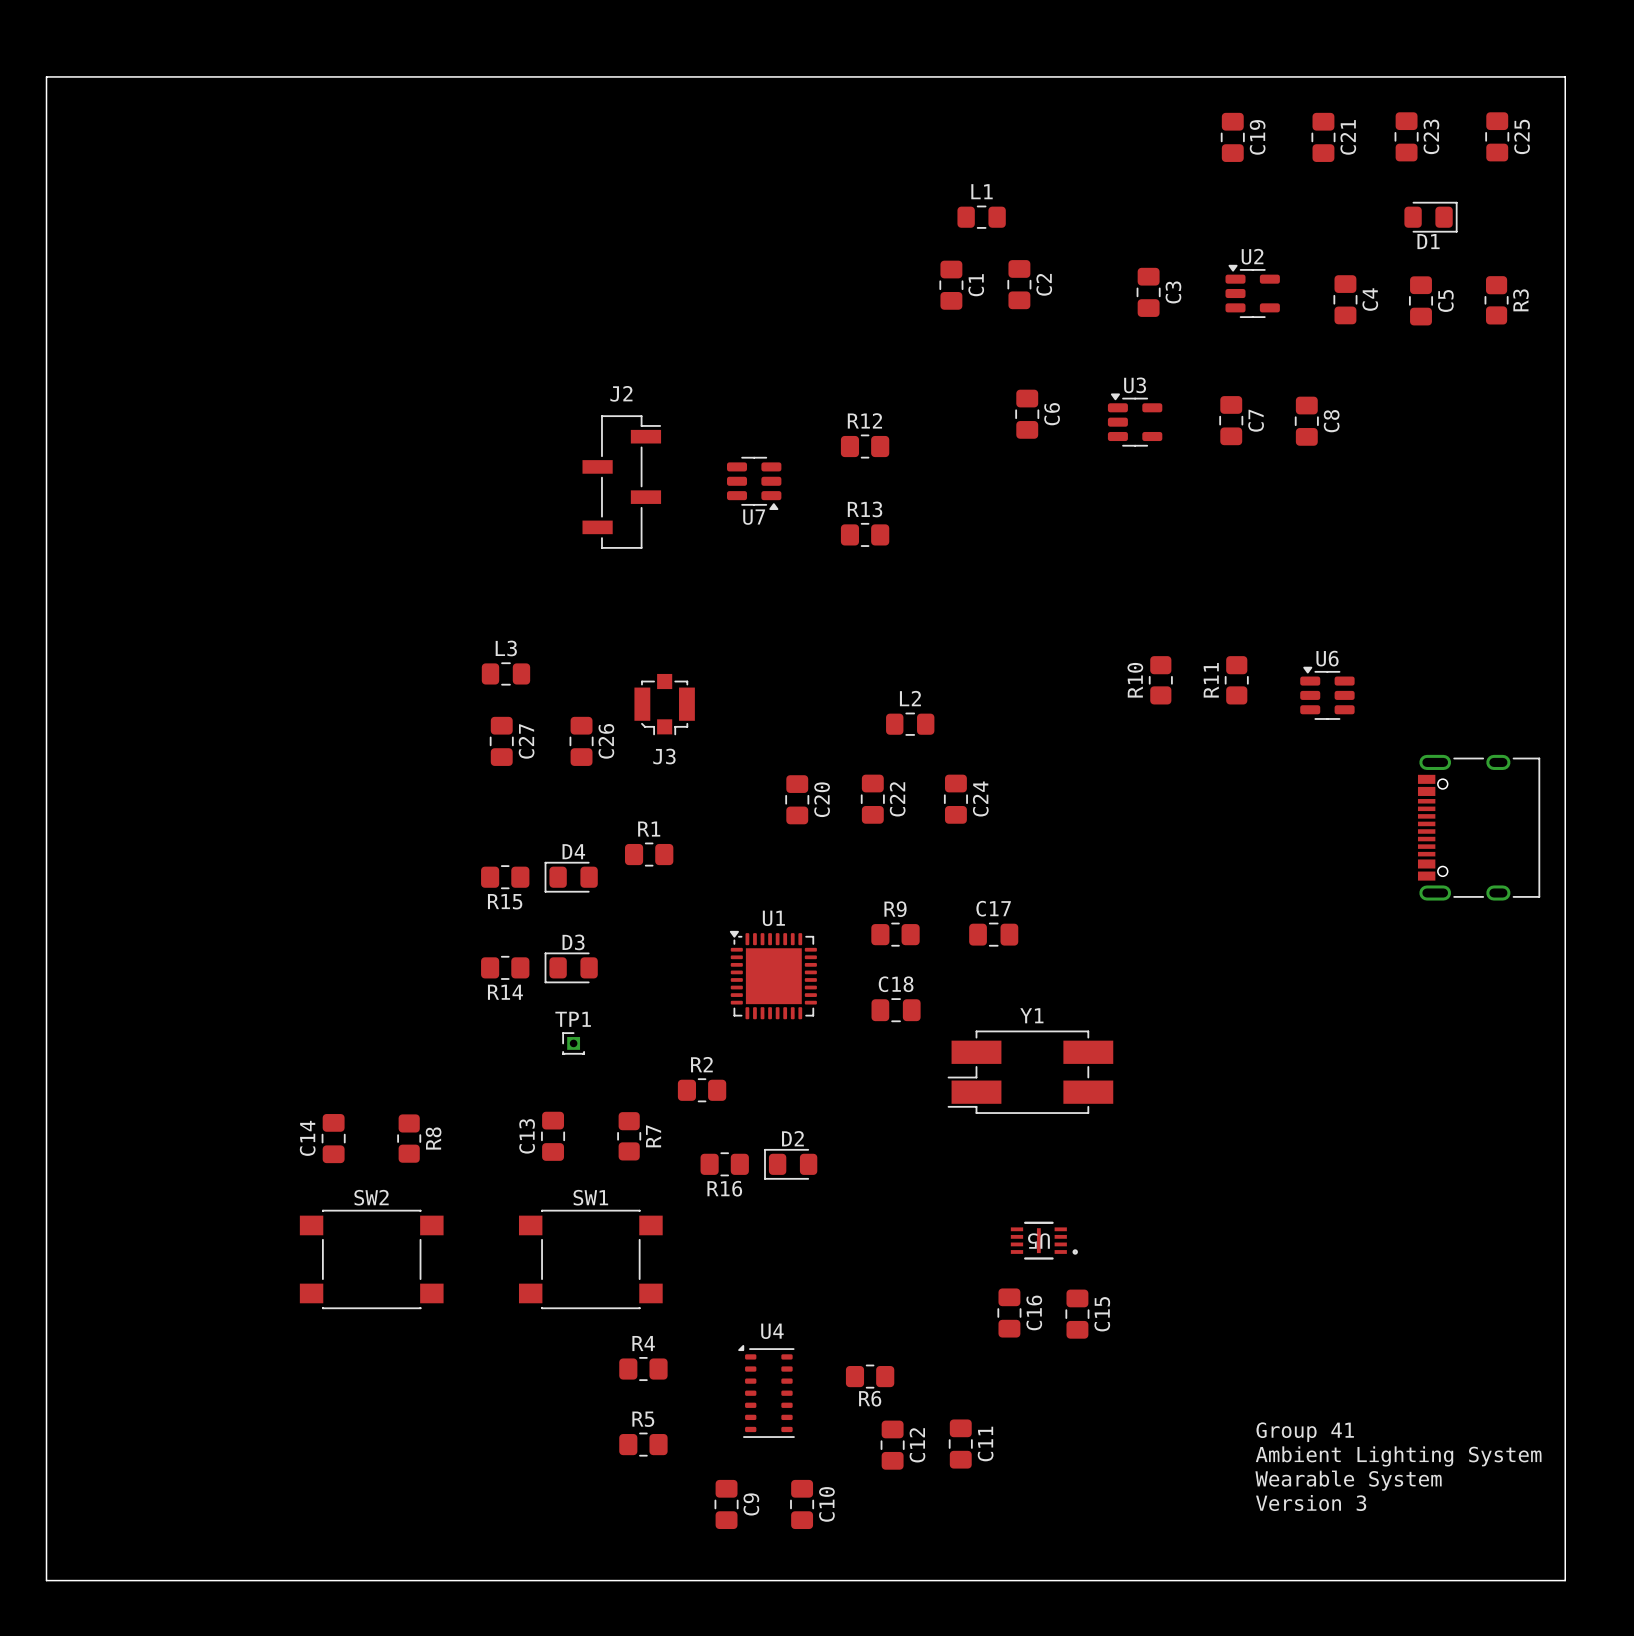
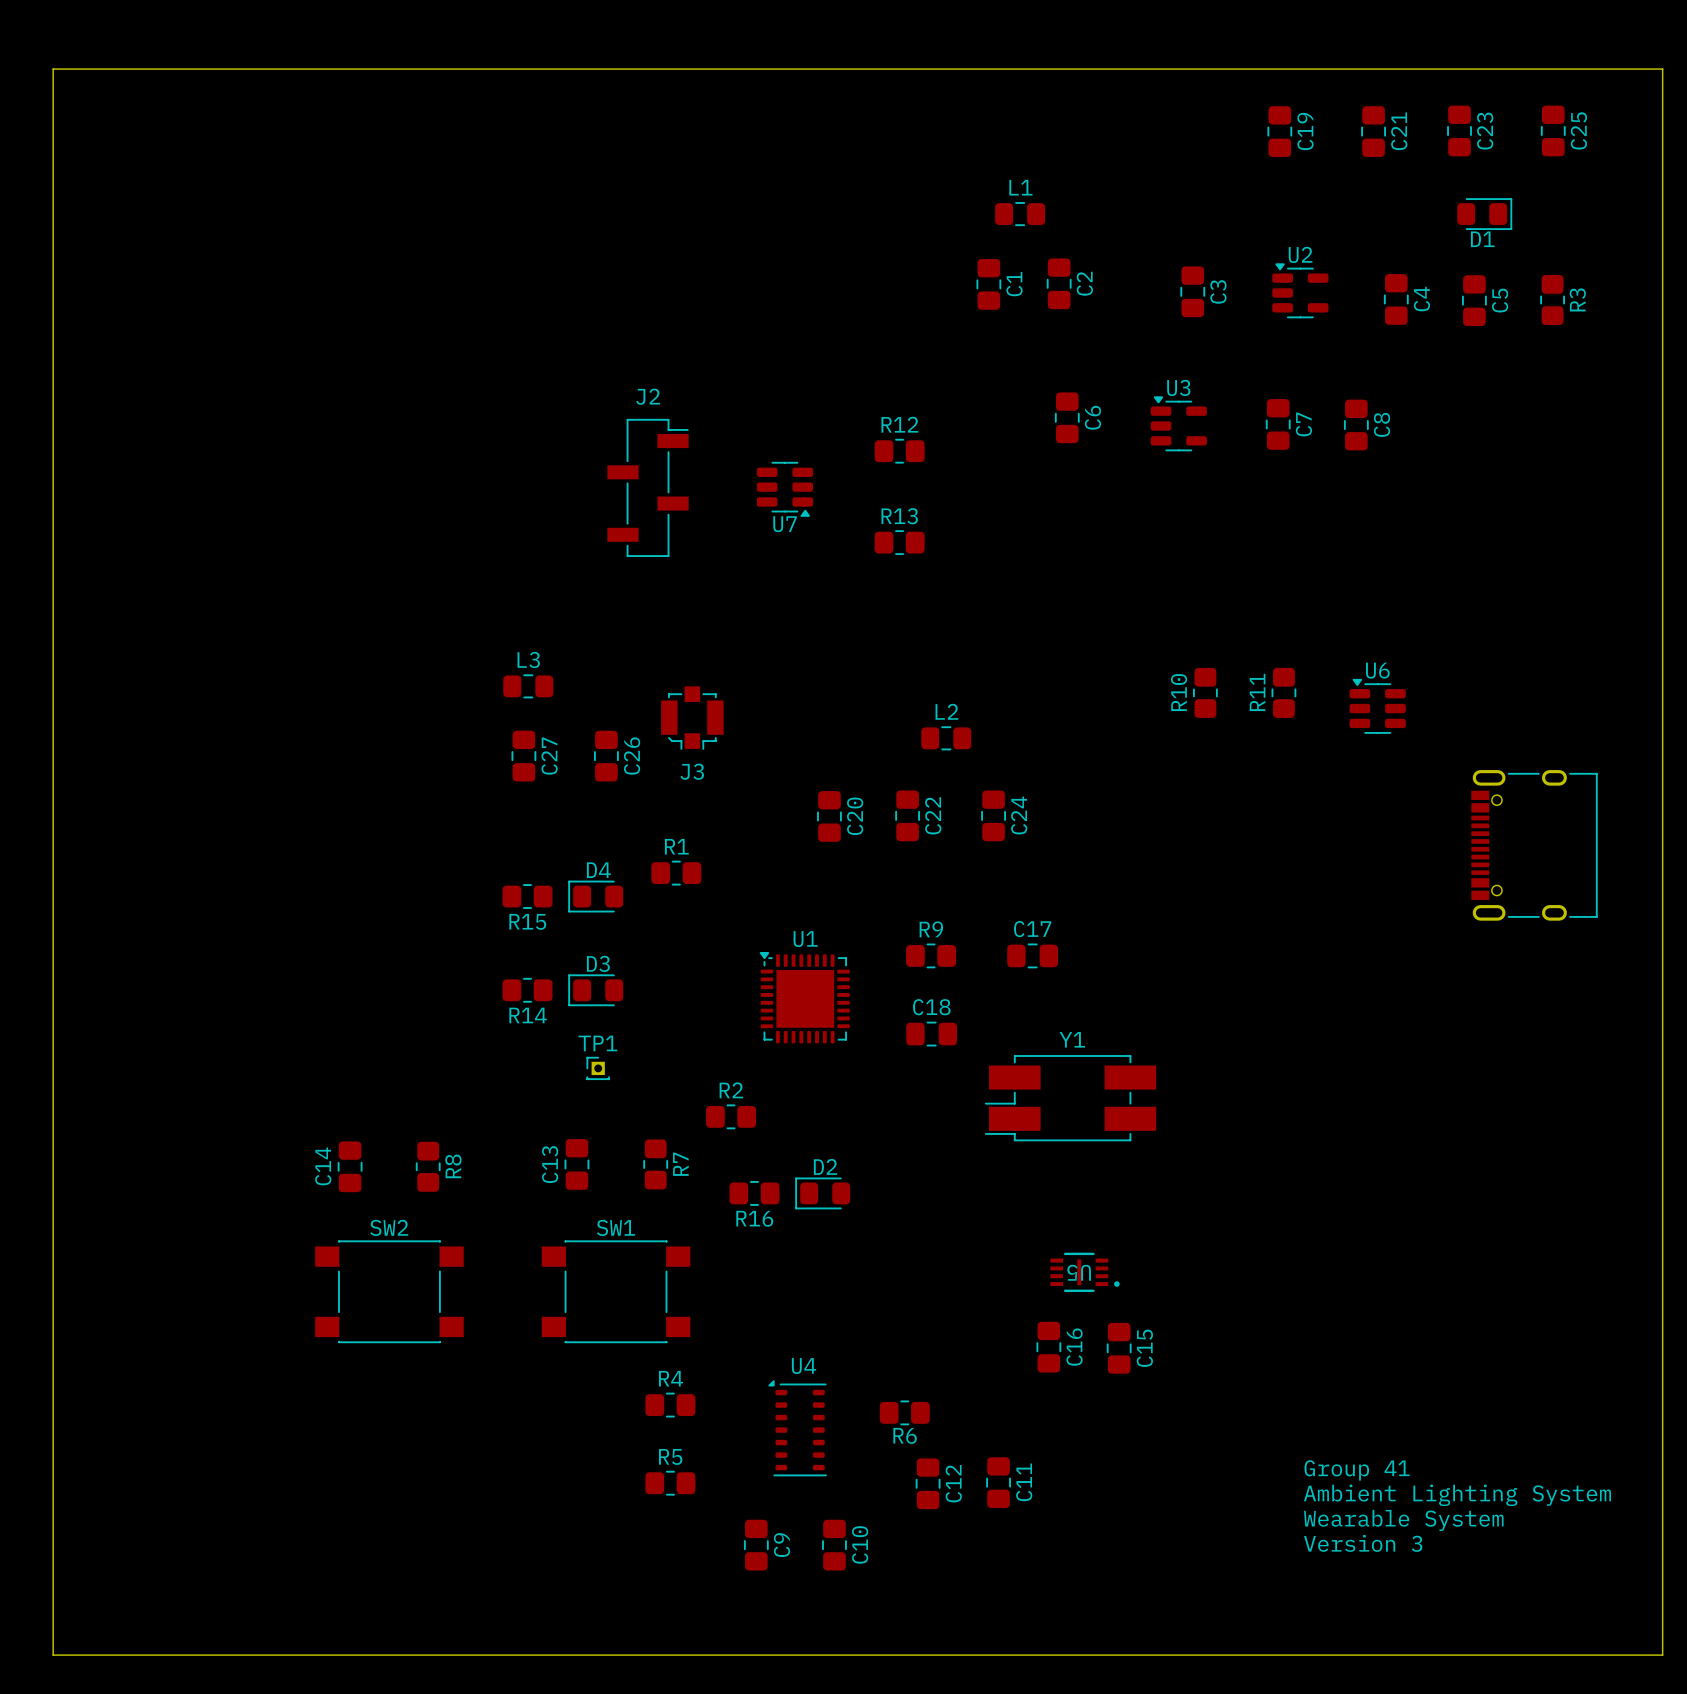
board edge: (1565, 76) (1565, 1580) (46, 1580) -> (1623, 69) (1662, 69) (1662, 1655) (53, 1655) (53, 1623)

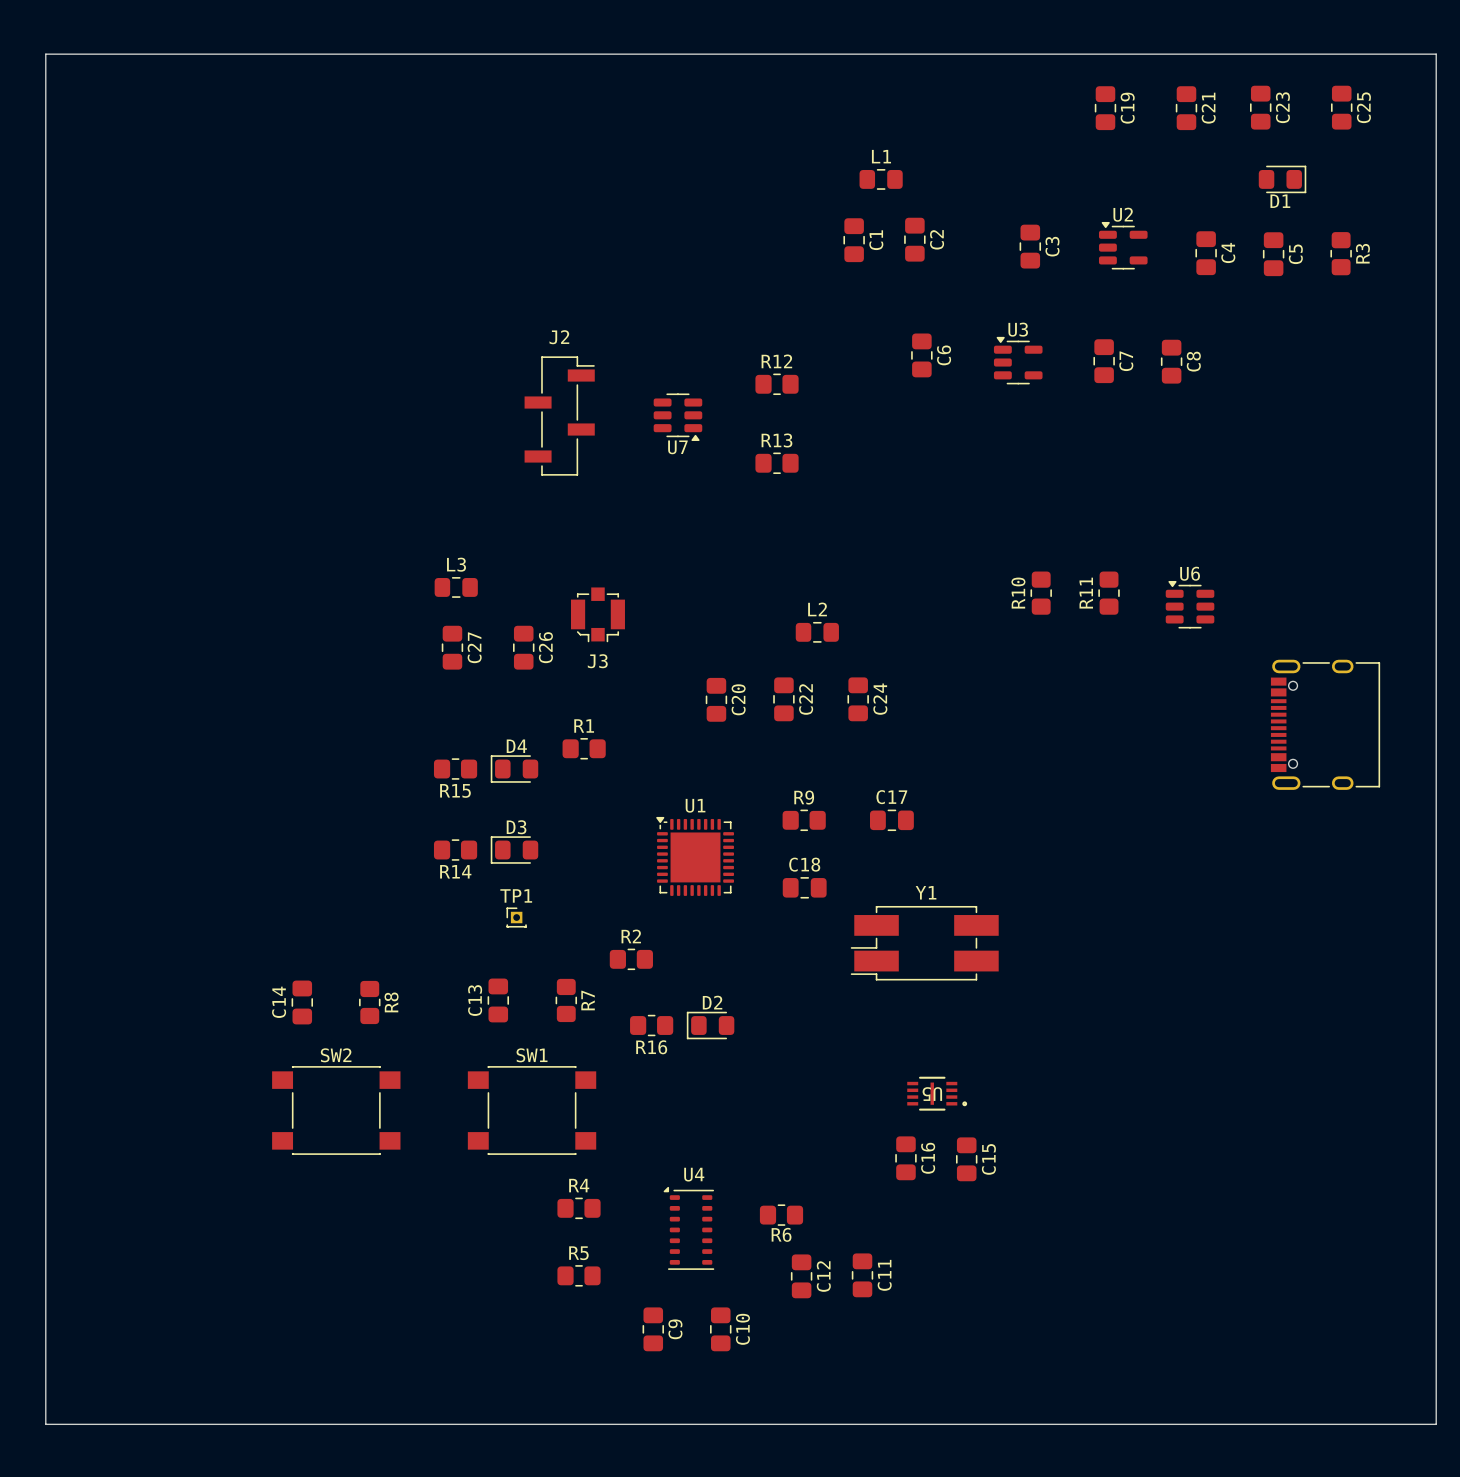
text: Group 41 (1357, 1470) -> none
text: Ambient Lighting System (1457, 1495) -> none
text: Wearable System (1403, 1520) -> none
text: Version 3 (1363, 1543) -> none

